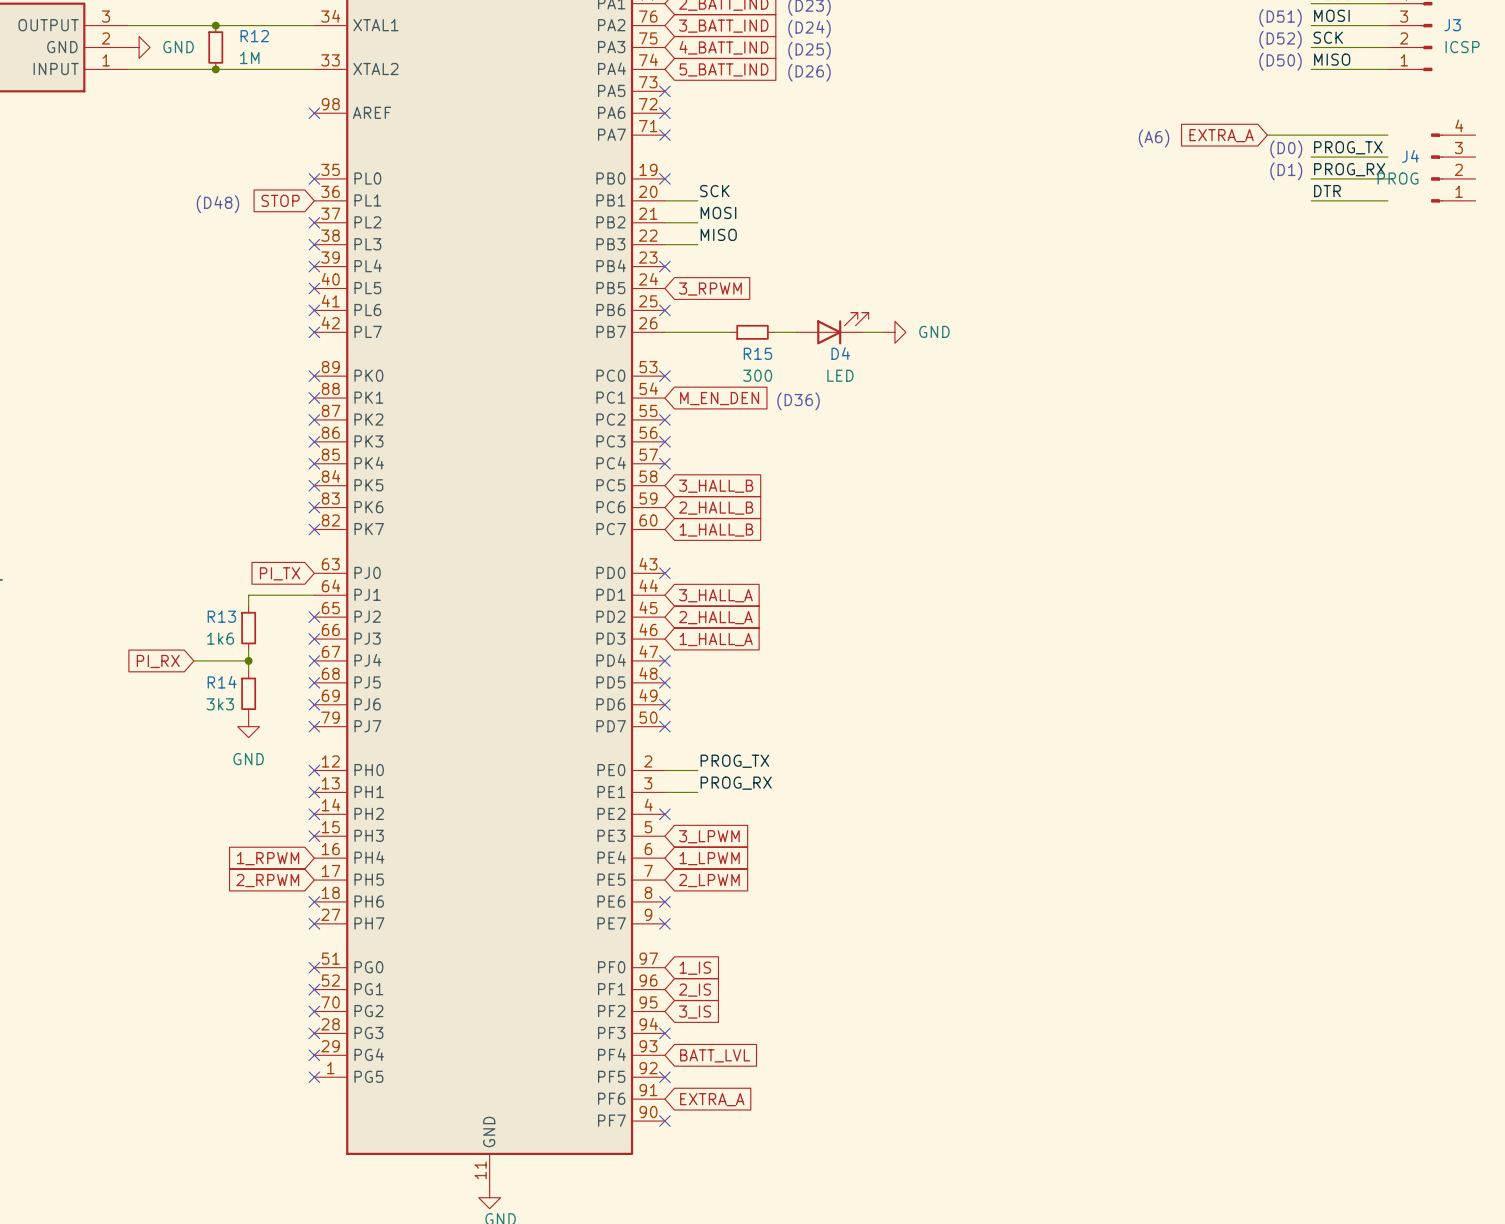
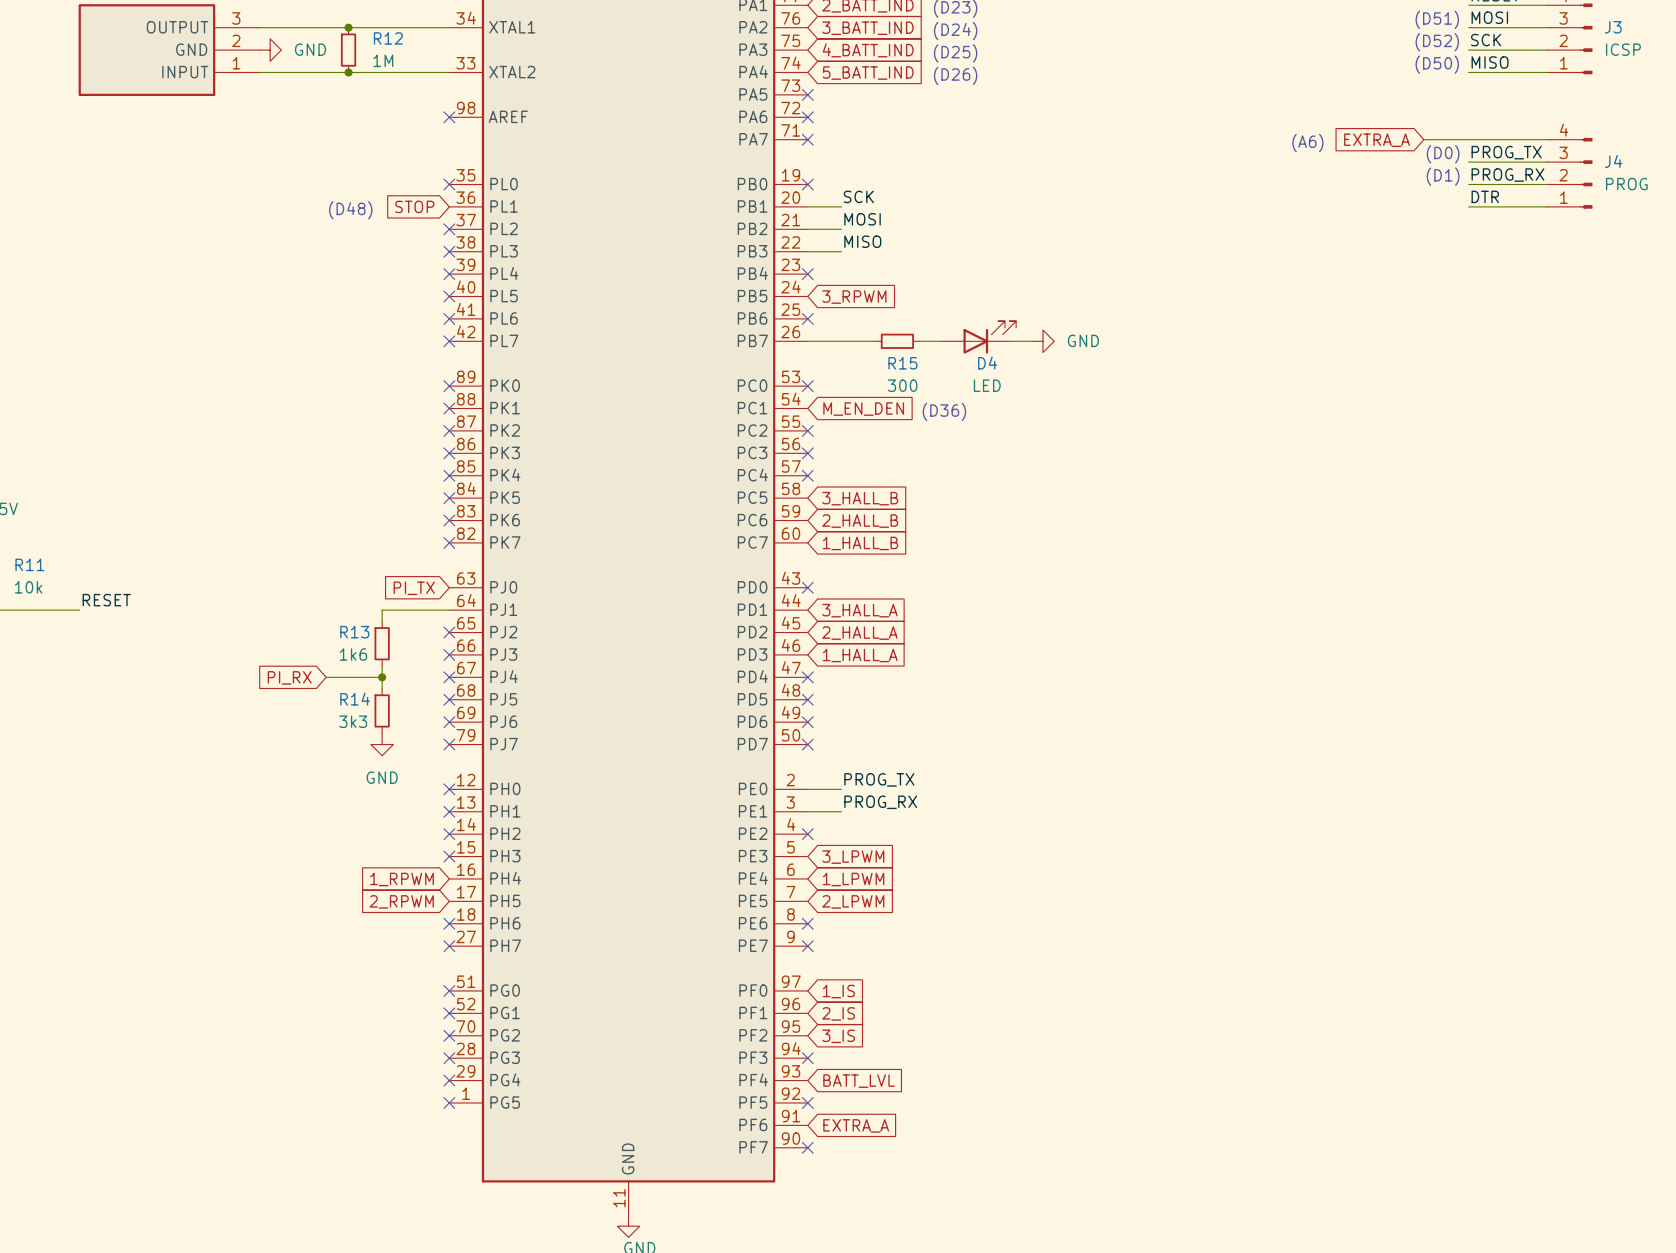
J4 flip: as is (1437, 167) -> left-right (1586, 173)
J4 position: (1453, 167) -> (1569, 173)

